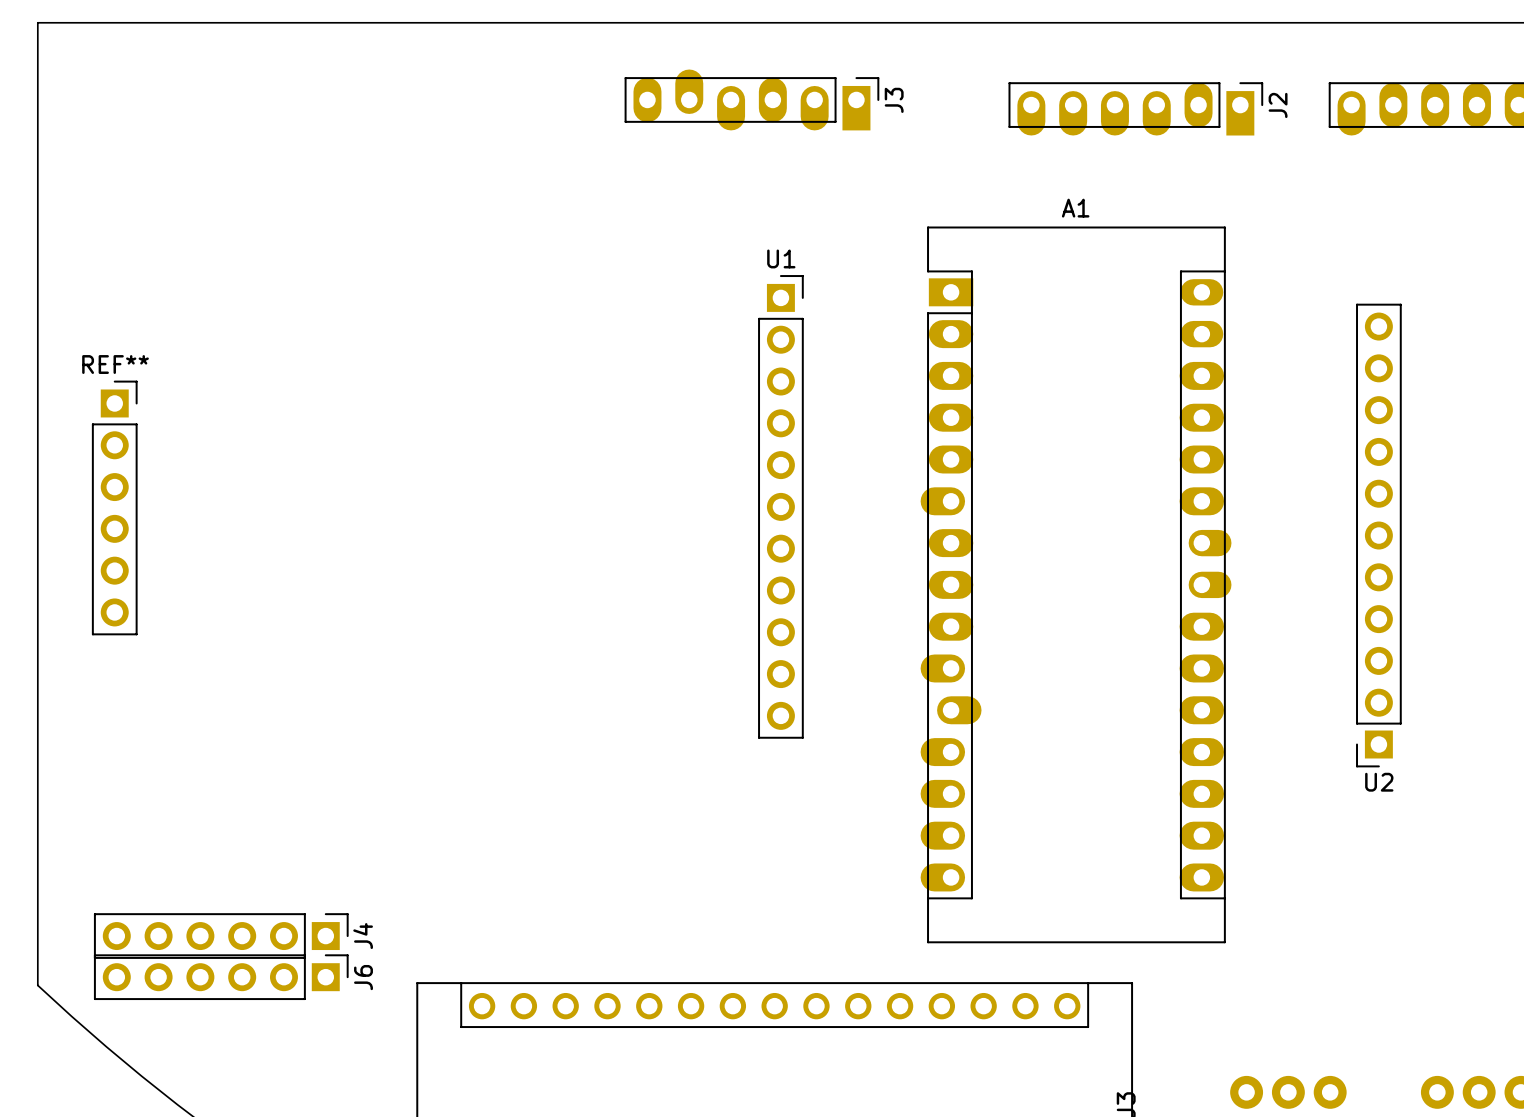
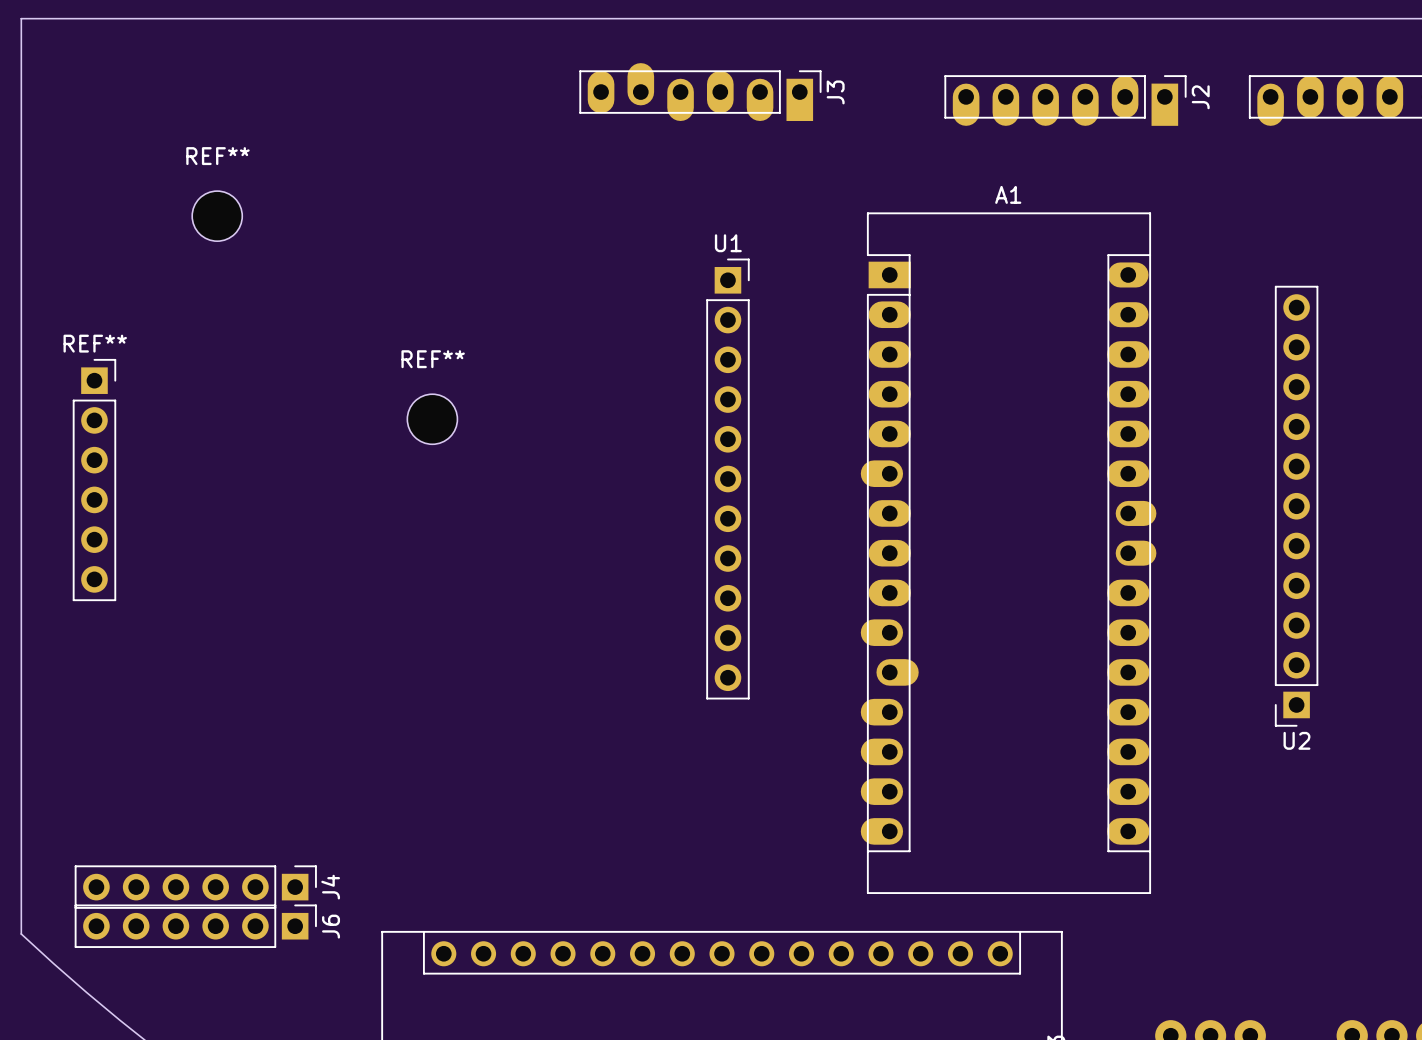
REF**: none -> (217, 216)
REF**: none -> (432, 419)

